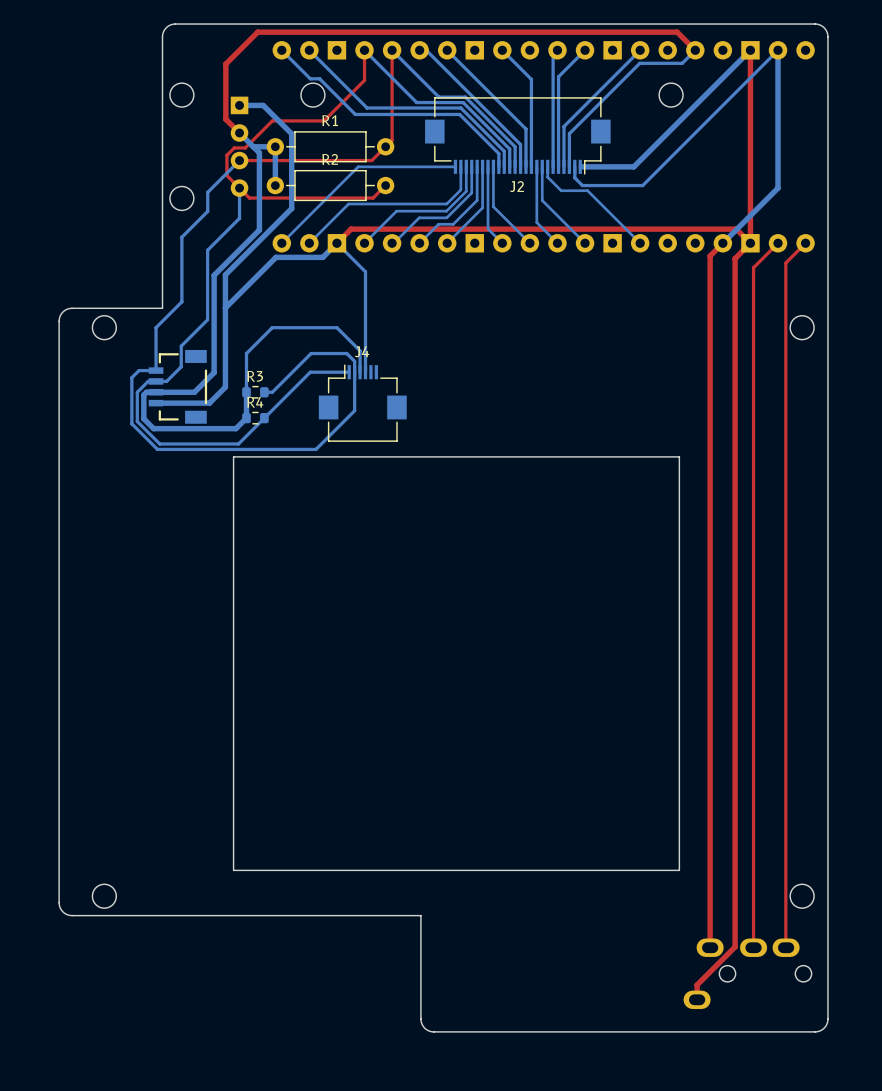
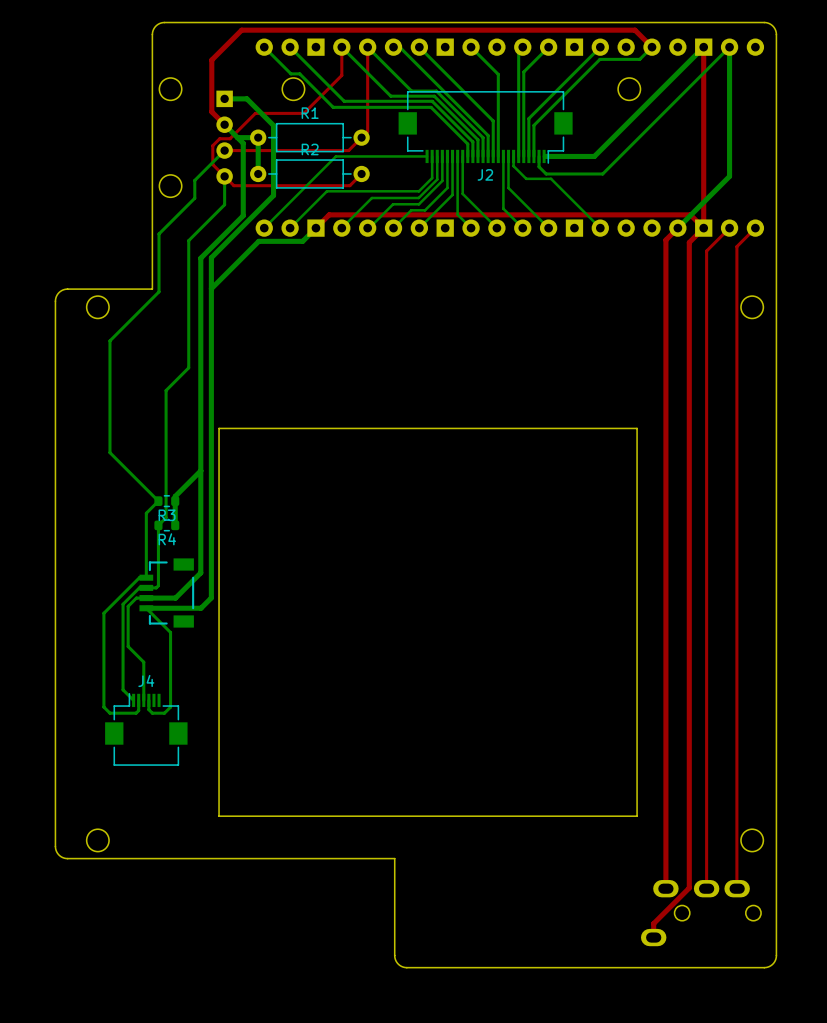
bottom track: (181, 237) (181, 301) (156, 327) (156, 370) (138, 370) (131, 377) (131, 423) (157, 449) (316, 449) (354, 410) (354, 361) (346, 353) (311, 353) (272, 392) (264, 392) -> (170, 222) (159, 234) (159, 291) (109, 340) (109, 452) (158, 501) (146, 513) (146, 577) (139, 577) (103, 613) (103, 707) (109, 713) (136, 713) (138, 710) (138, 700)
bottom track: (336, 243) (365, 271) (365, 372) -> none
bottom track: (207, 250) (207, 319) (181, 346) (181, 366) (166, 381) (148, 381) (137, 392) (137, 421) (159, 443) (238, 443) (310, 372) (349, 372) -> (194, 234) (188, 240) (188, 367) (166, 390) (166, 517) (158, 525) (158, 585) (156, 587) (139, 587) (123, 604) (123, 689) (133, 700)
bottom track: (214, 372) (194, 392) (146, 392) (143, 394) (143, 418) (153, 428) (235, 428) (246, 418) (246, 390) -> (200, 349) (200, 572) (175, 598) (136, 598) (128, 606) (128, 646) (143, 662) (143, 700)
bottom track: (360, 372) (360, 350) (336, 327) (272, 327) (246, 353) (246, 392) -> none
R3 name position: R3 (255, 376) -> R3 (167, 515)
part position: (177, 386) -> (166, 592)
bottom track: (225, 387) (209, 403) (156, 403) -> (211, 363) (211, 597) (201, 608) (146, 608) (170, 632) (170, 707) (164, 713) (152, 713) (148, 709) (148, 700)
R3 position: (255, 392) -> (166, 501)
R4 name position: R4 (255, 402) -> R4 (167, 539)
J4 position: (362, 403) -> (146, 729)
R4 position: (255, 418) -> (166, 525)
bottom track: none -> (200, 470) (175, 496) (175, 525)

